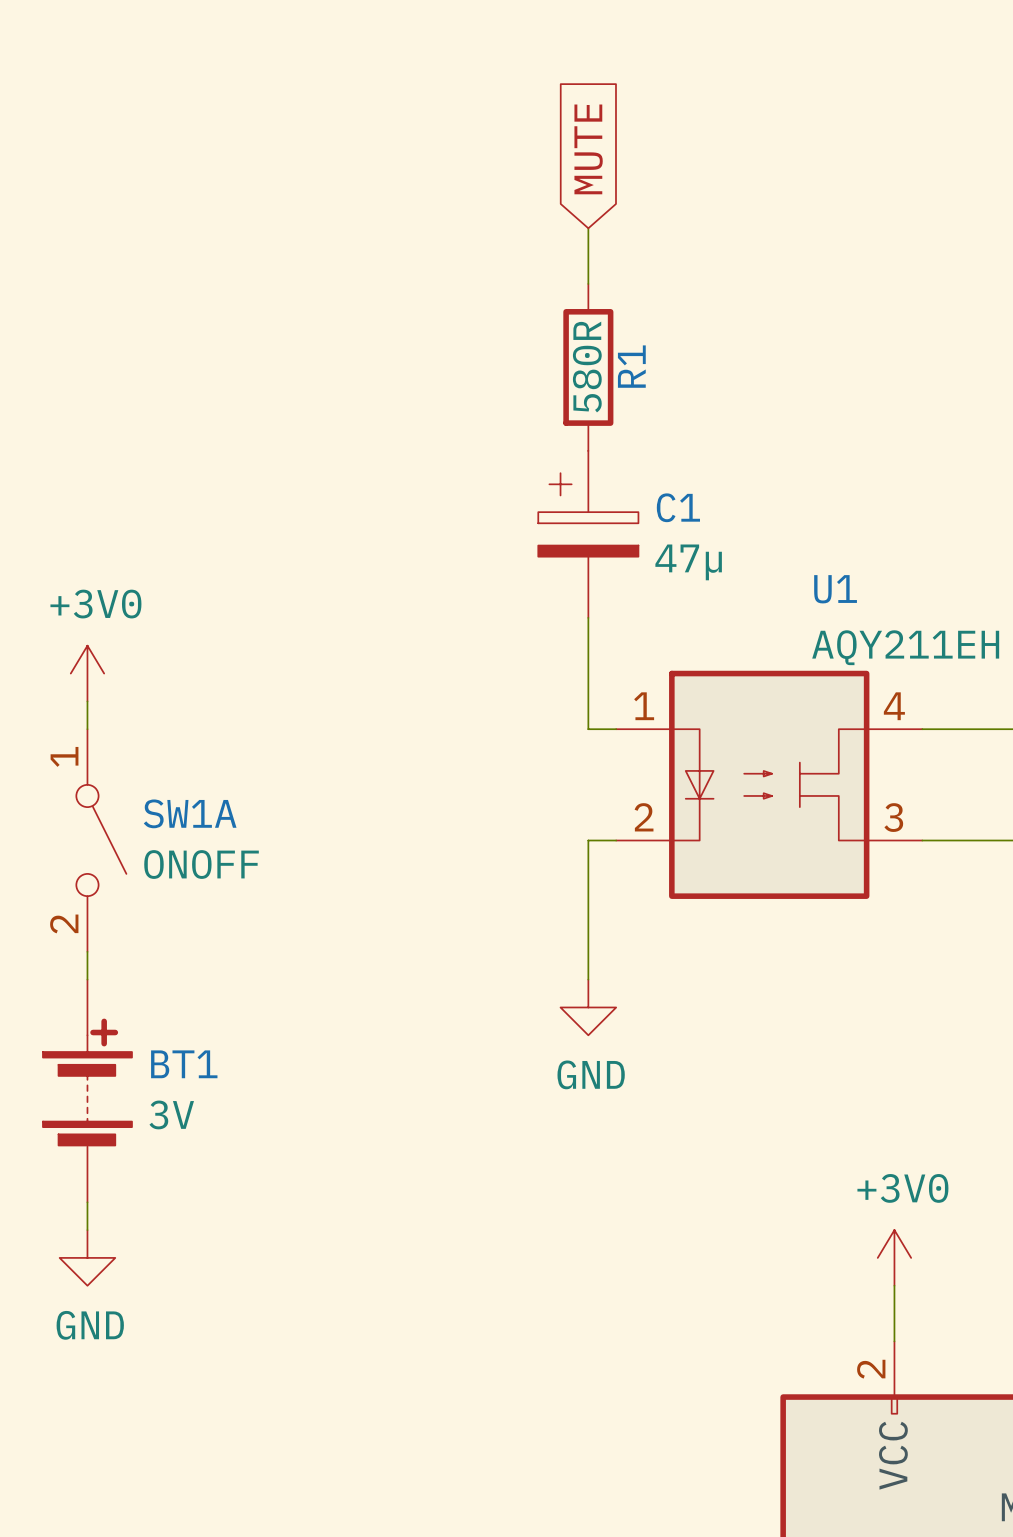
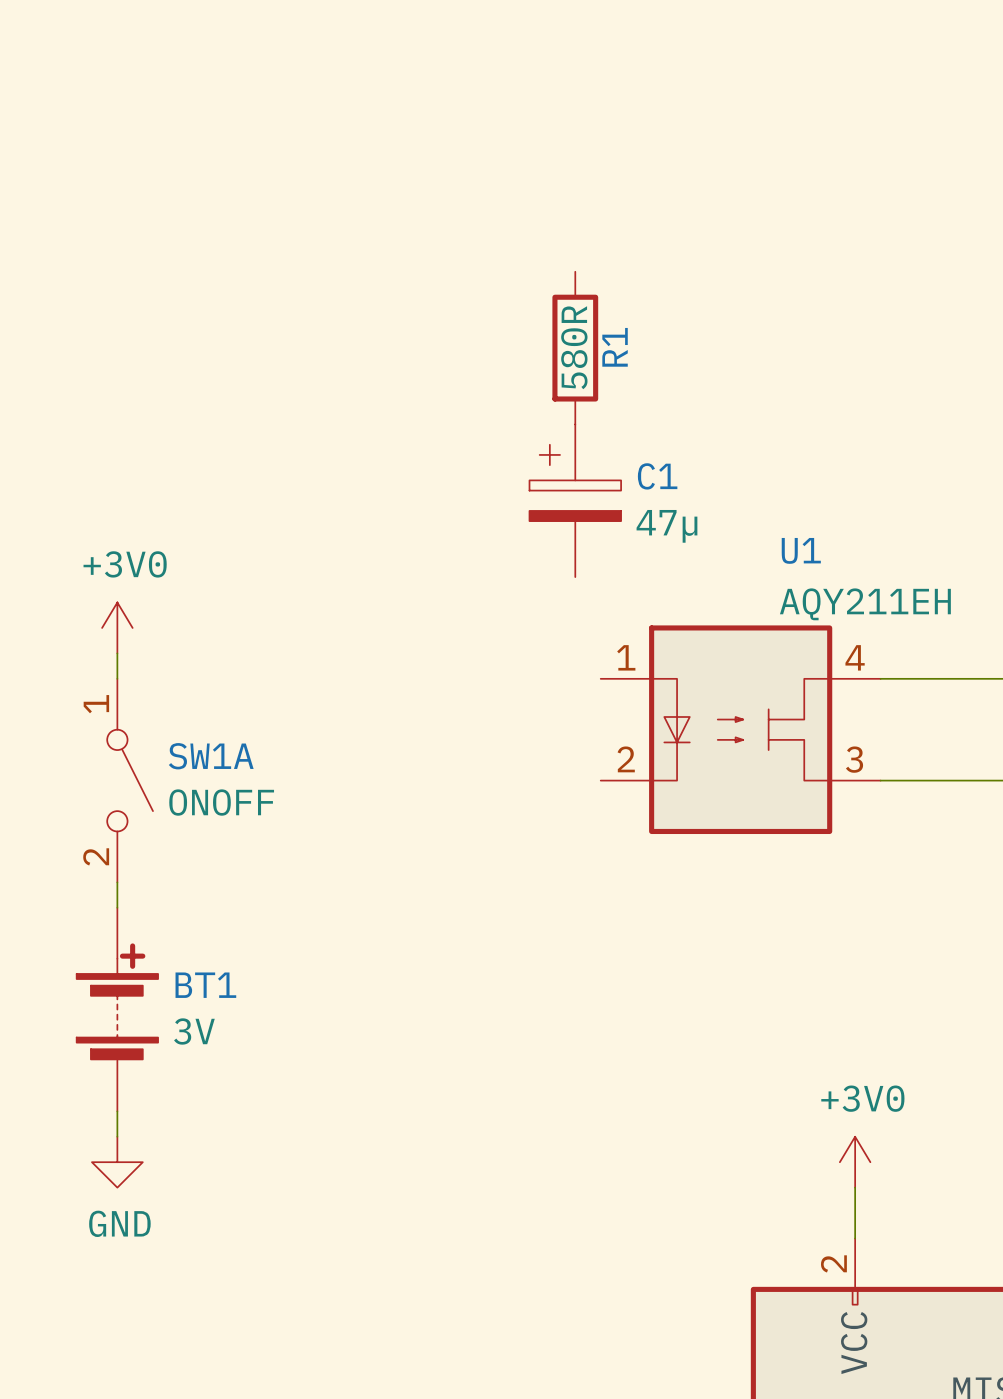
global label: MUTE (588, 149) -> none
wire: (588, 228) (588, 283) -> none
wire: (588, 617) (588, 729) (616, 729) -> none
wire: (616, 840) (588, 840) (588, 979) -> none
power symbol: GND (588, 1007) -> none

